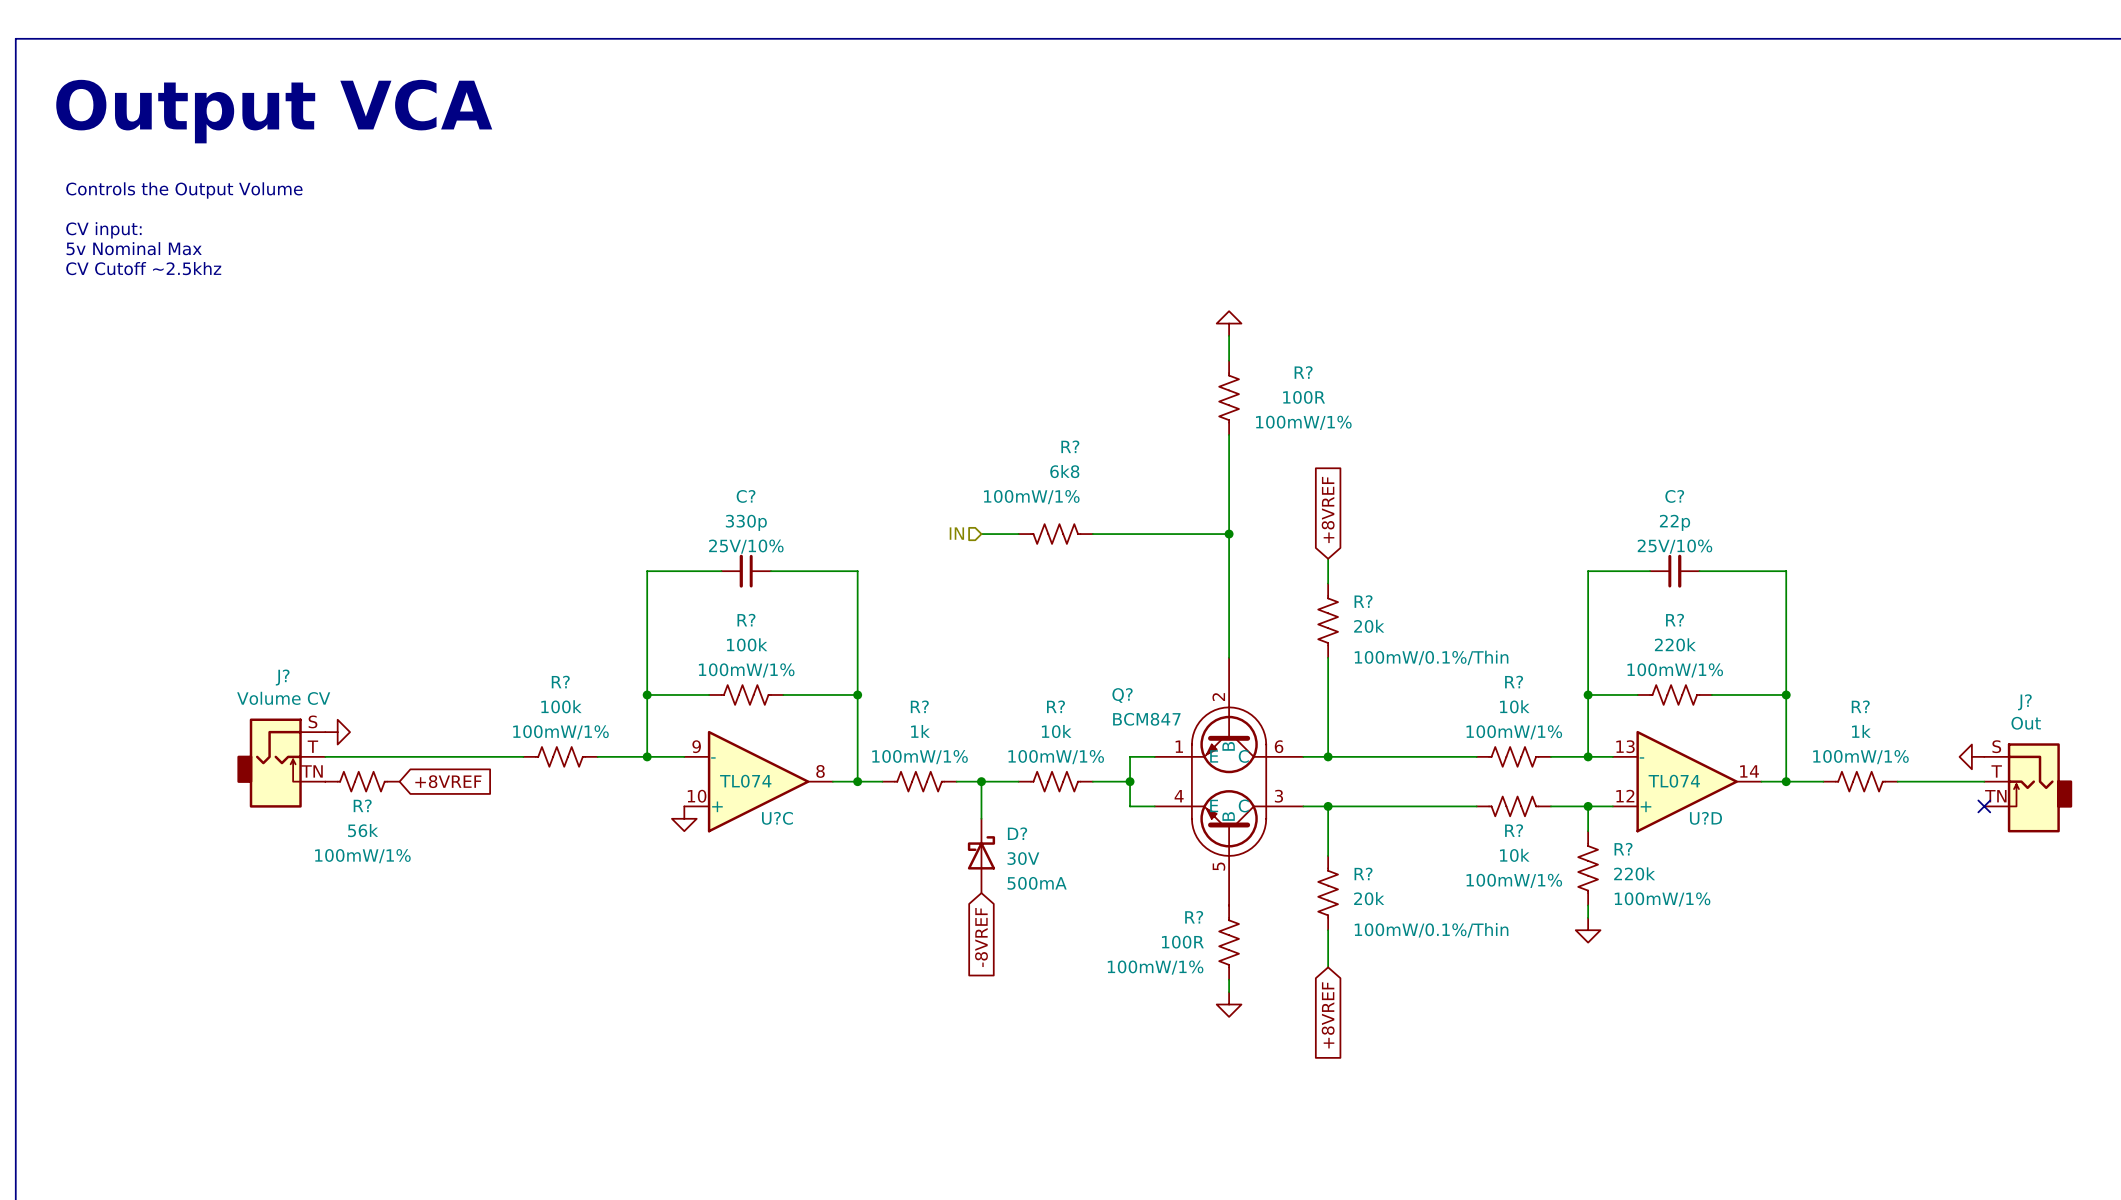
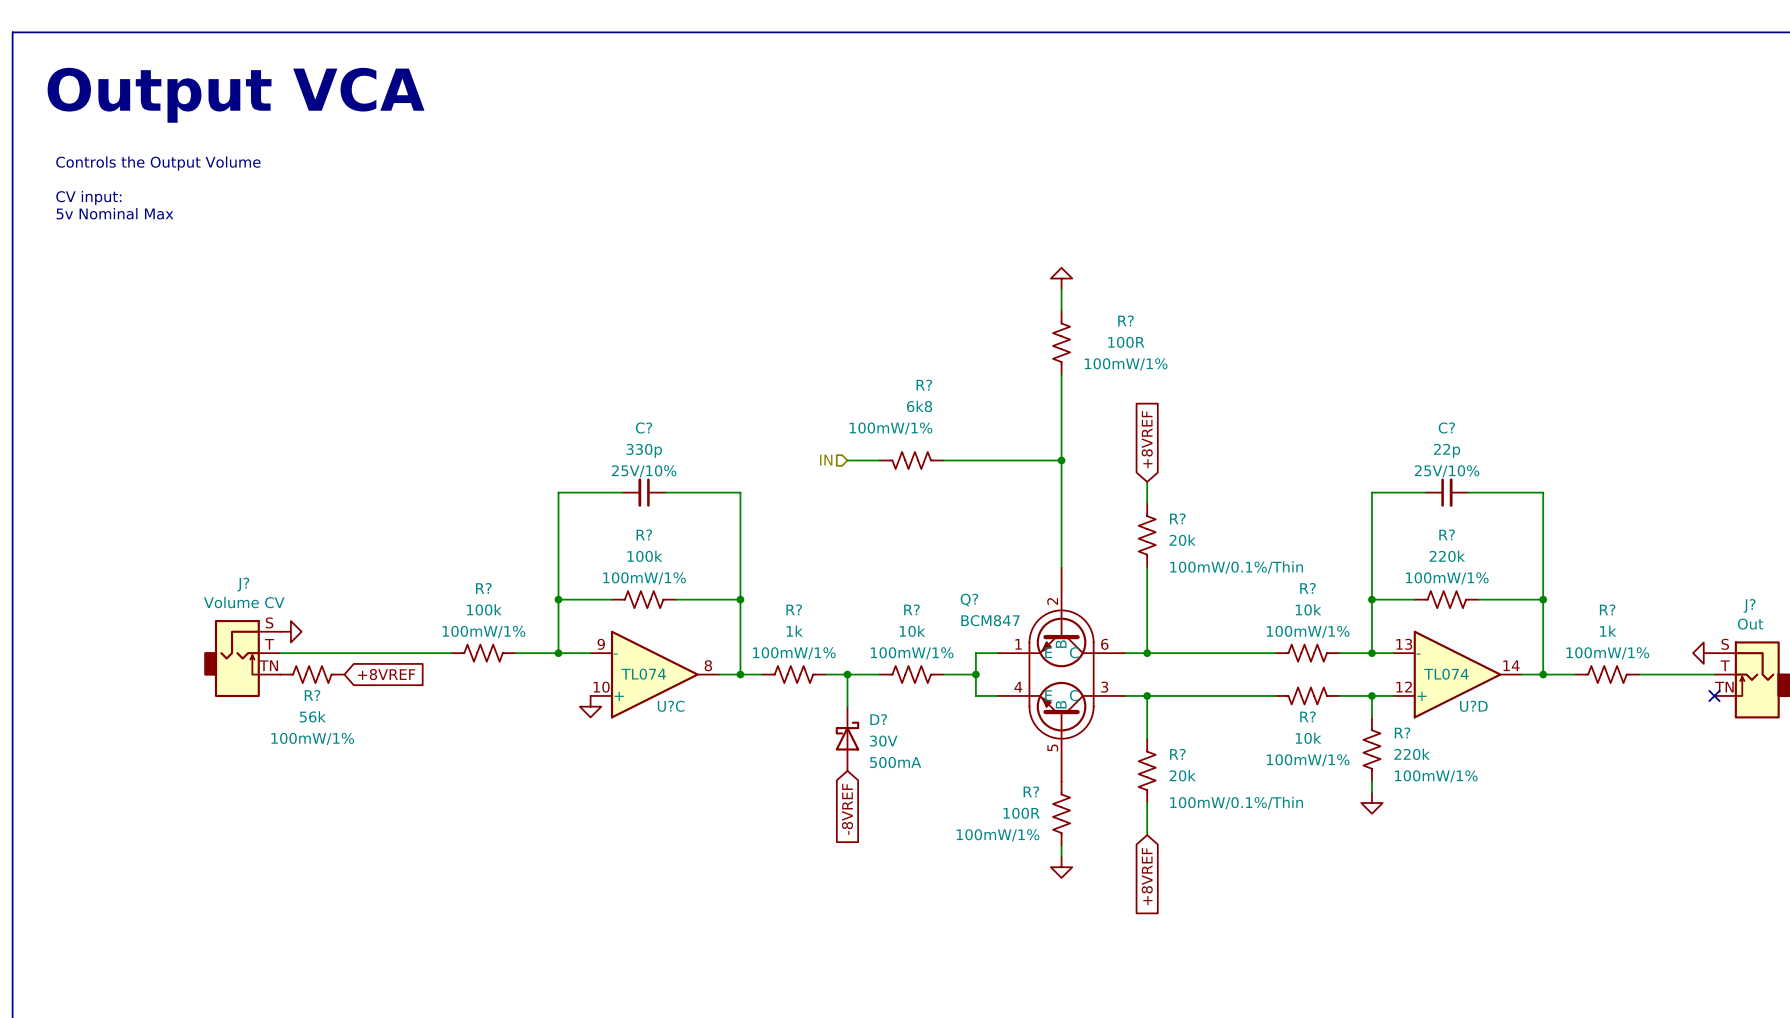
text: CV Cutoff ~2.5khz (143, 268) -> none

